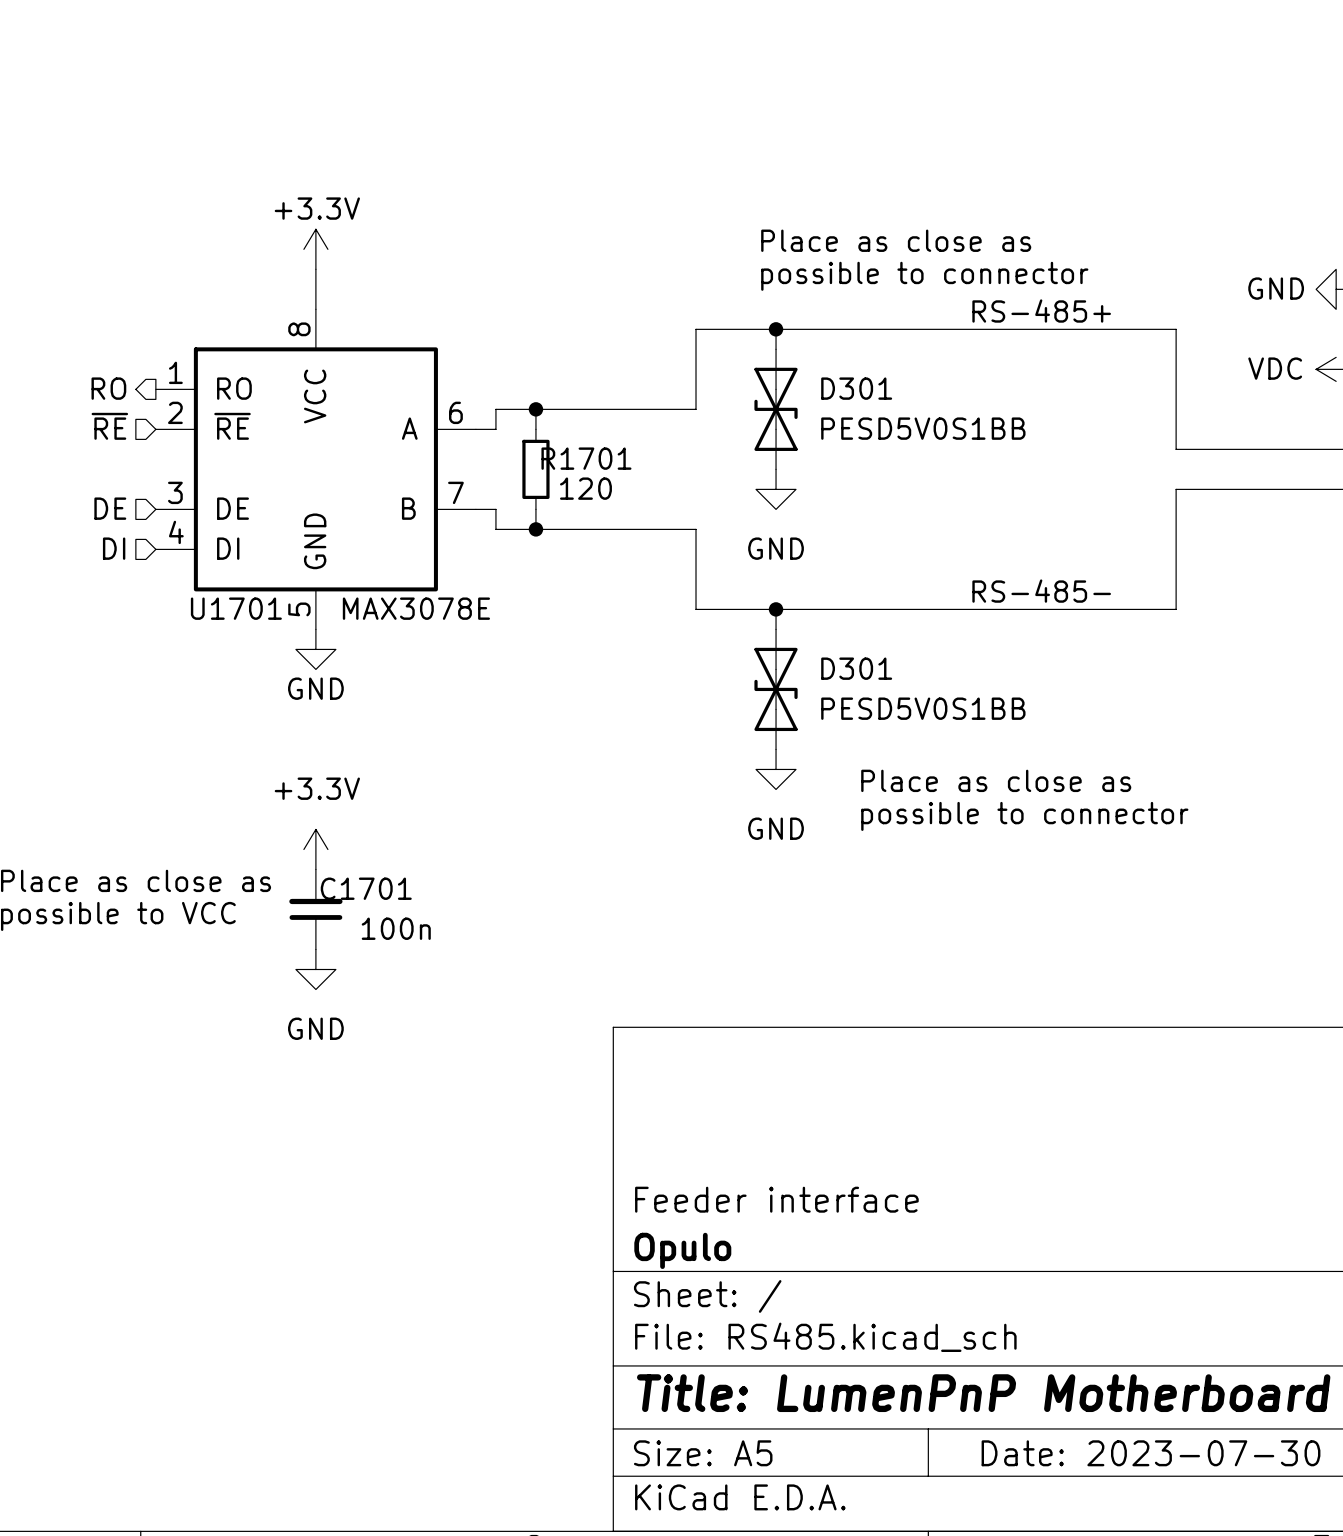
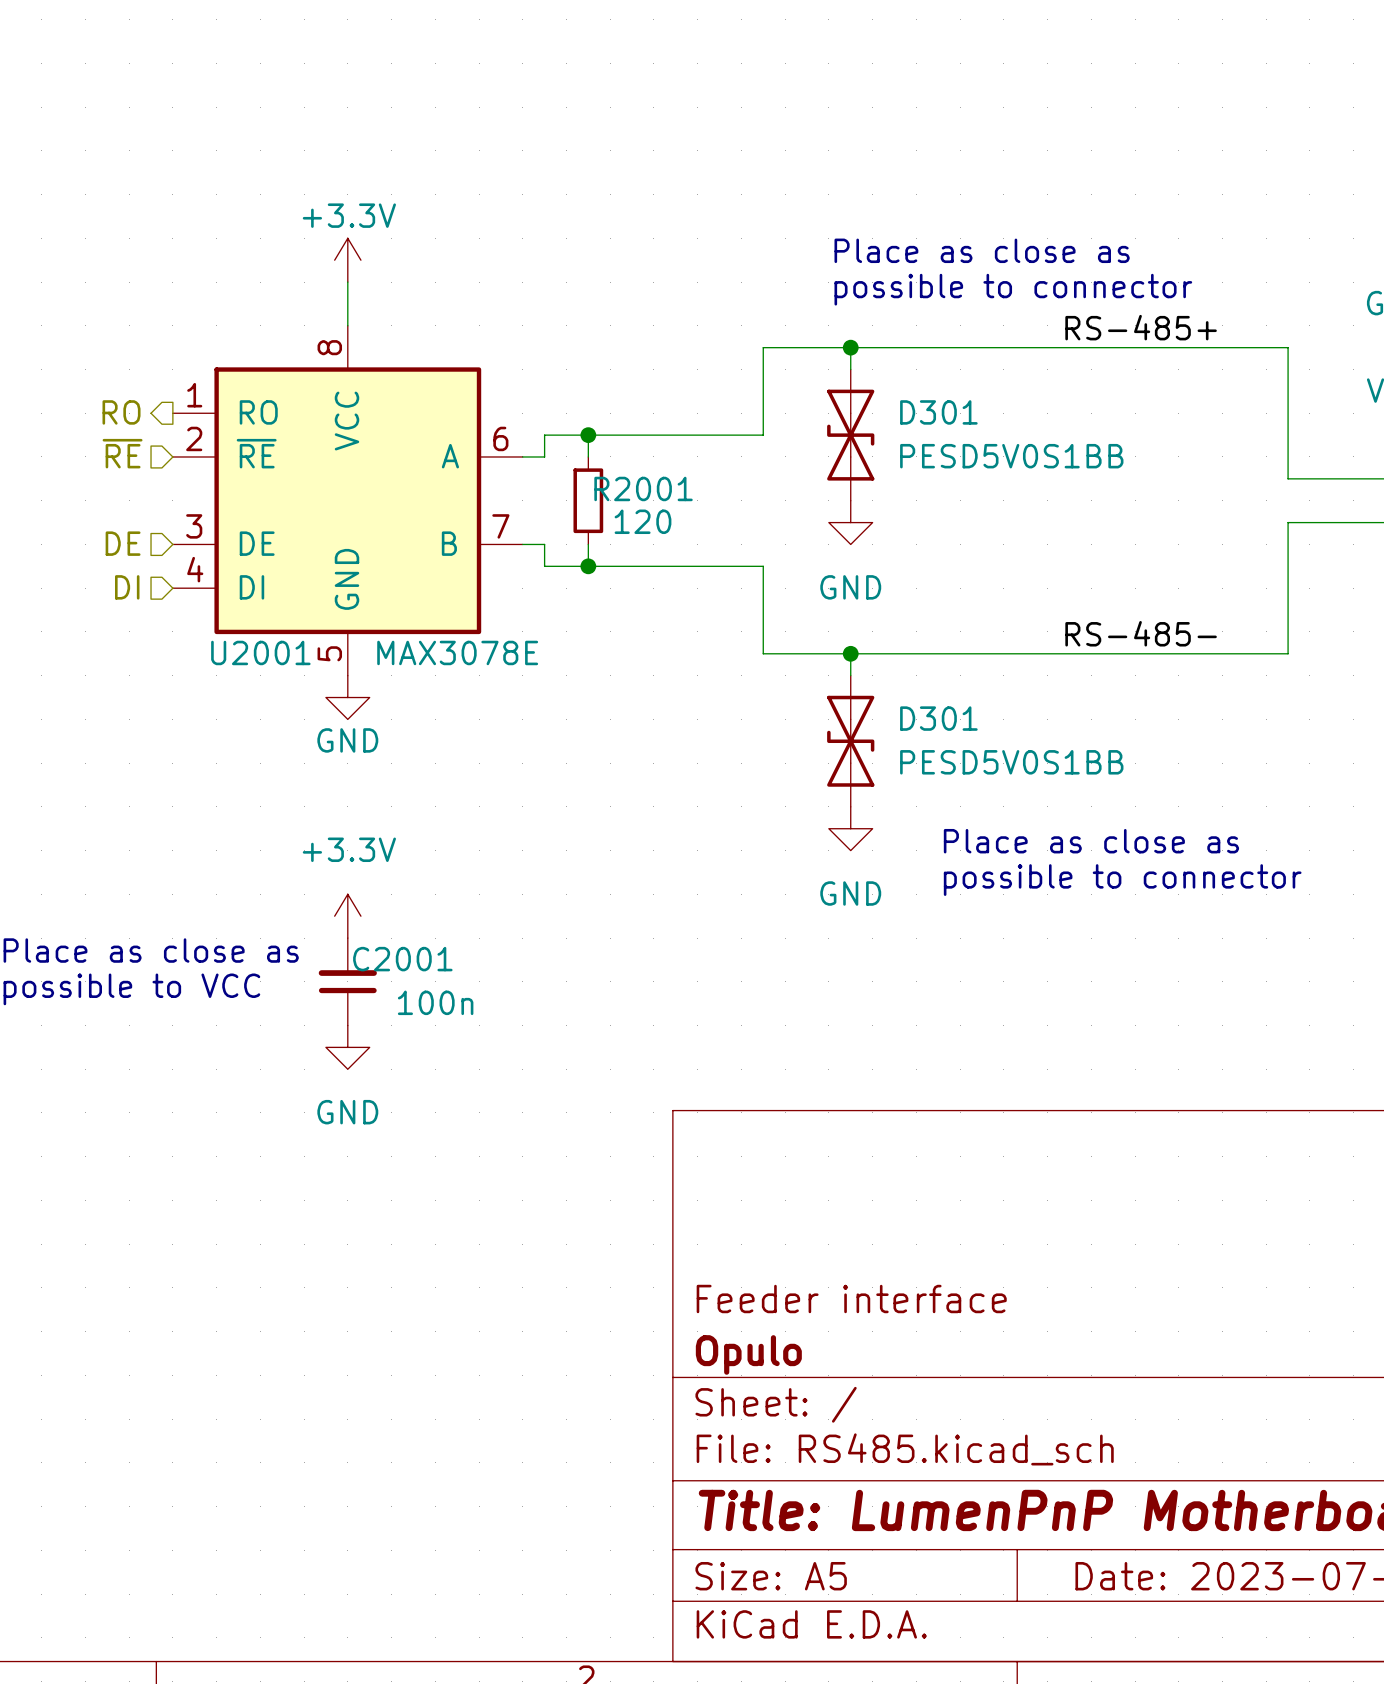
R1701 name: R1701 (586, 458) -> R2001 (643, 488)
U1701 name: U1701 (236, 608) -> U2001 (260, 652)
C1701 name: C1701 (366, 888) -> C2001 (402, 959)

